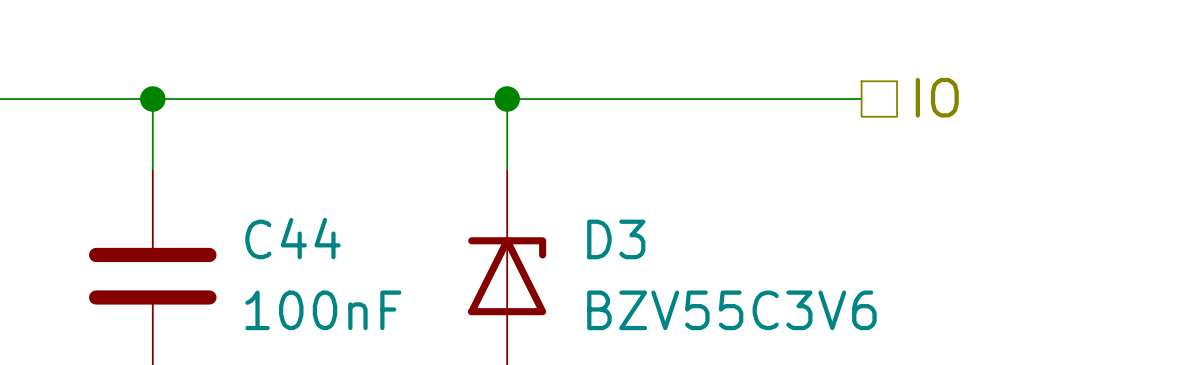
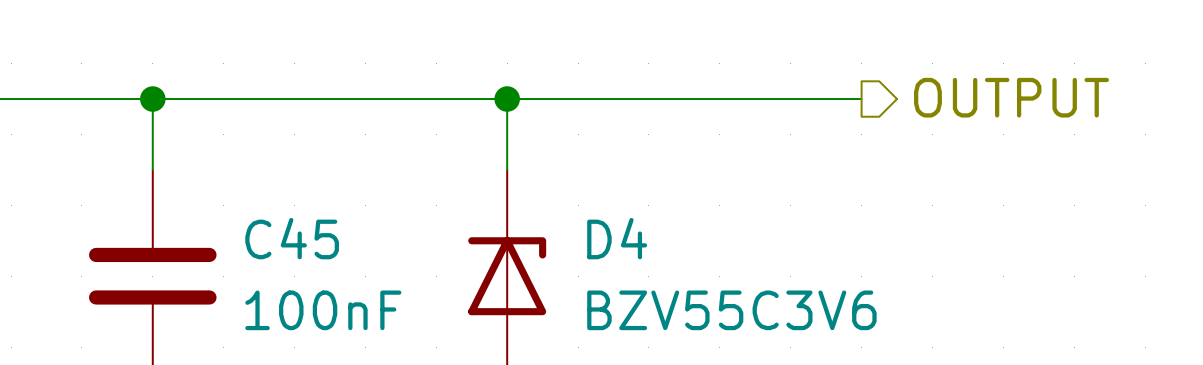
hierarchical label shape: passive (937, 97) -> output (1011, 97)
hierarchical label: IO (937, 97) -> OUTPUT (1011, 97)
C44 name: C44 (292, 238) -> C45 (292, 238)
D3 name: D3 (616, 239) -> D4 (617, 238)

